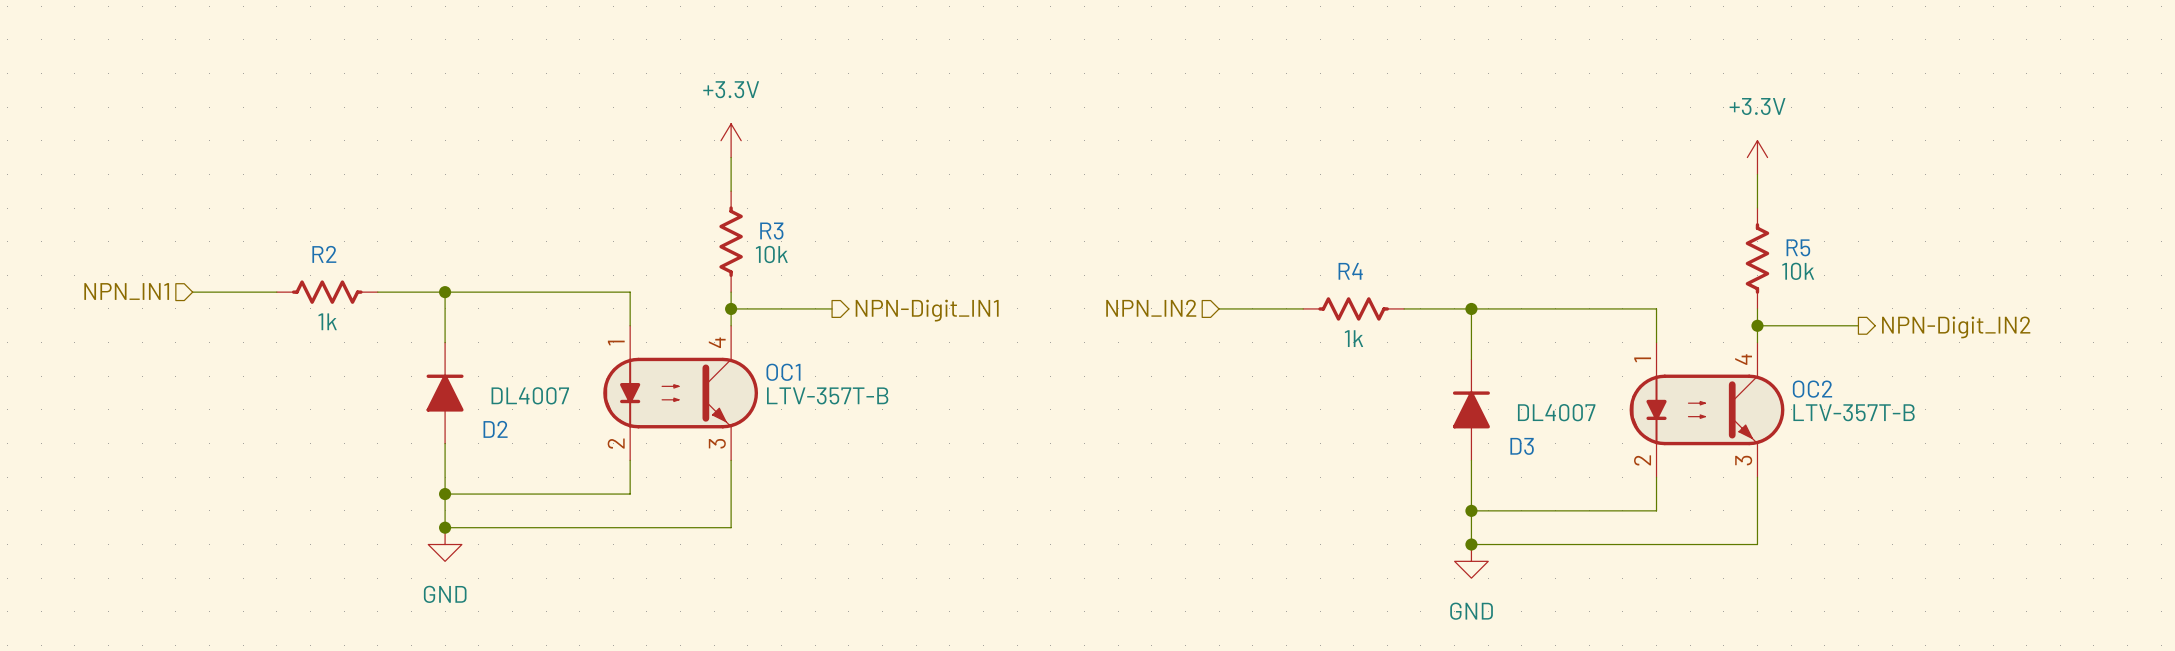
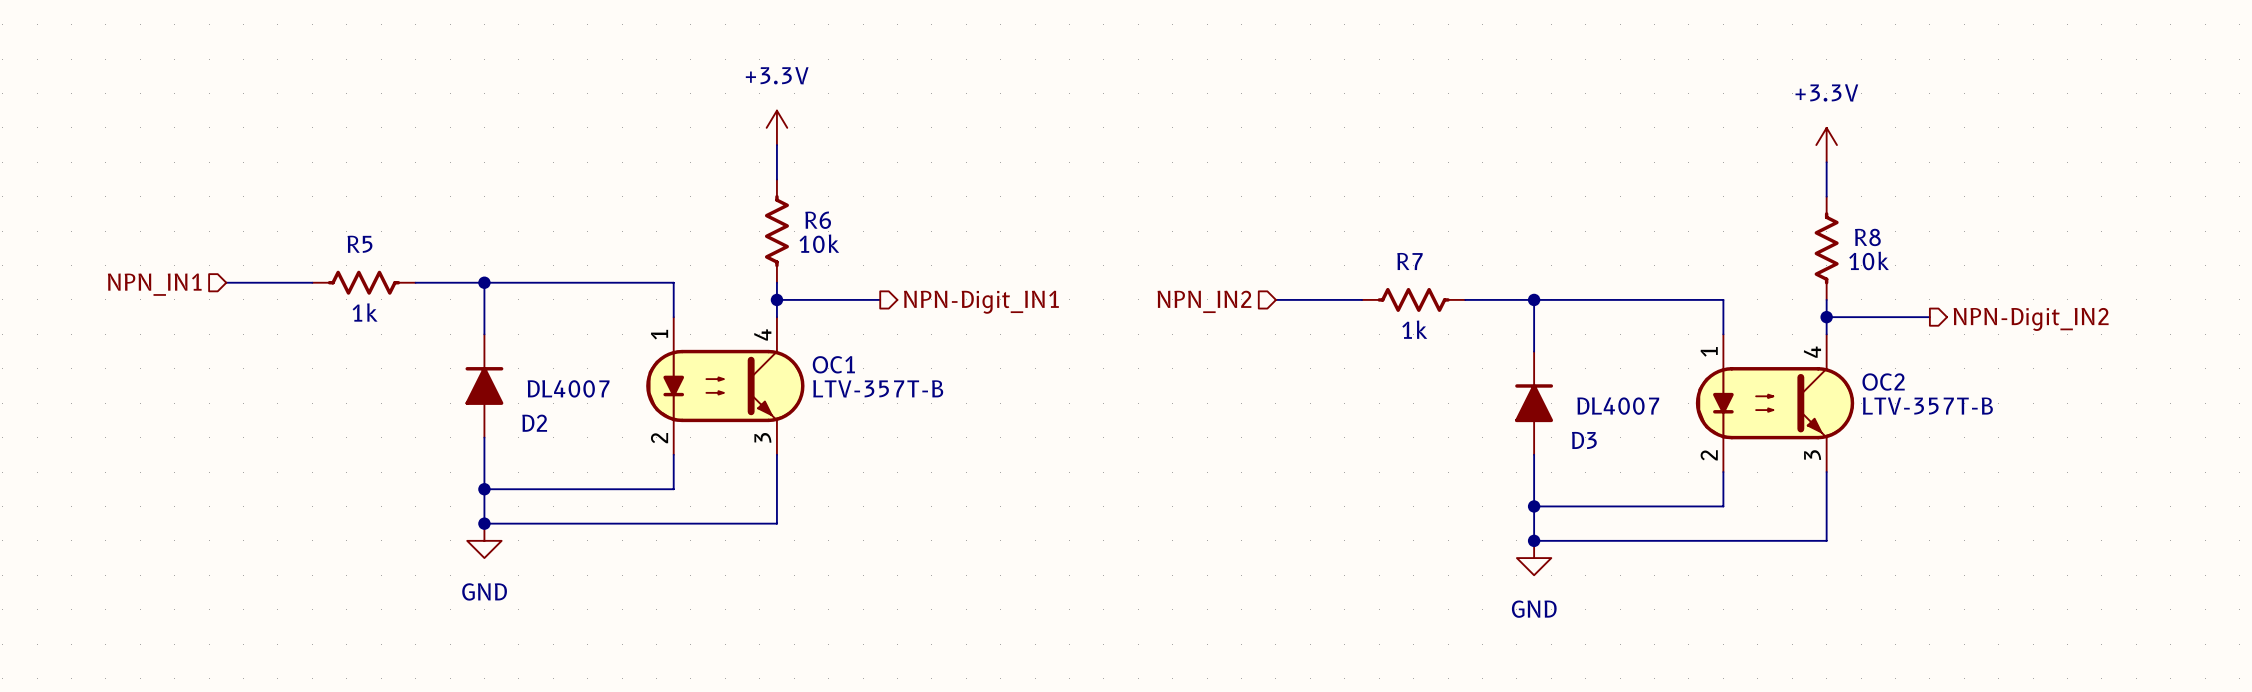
R3 name: R3 (771, 231) -> R6 (818, 220)
R5 name: R5 (1798, 247) -> R8 (1867, 237)
R2 name: R2 (324, 254) -> R5 (359, 244)
R4 name: R4 (1350, 271) -> R7 (1409, 261)

